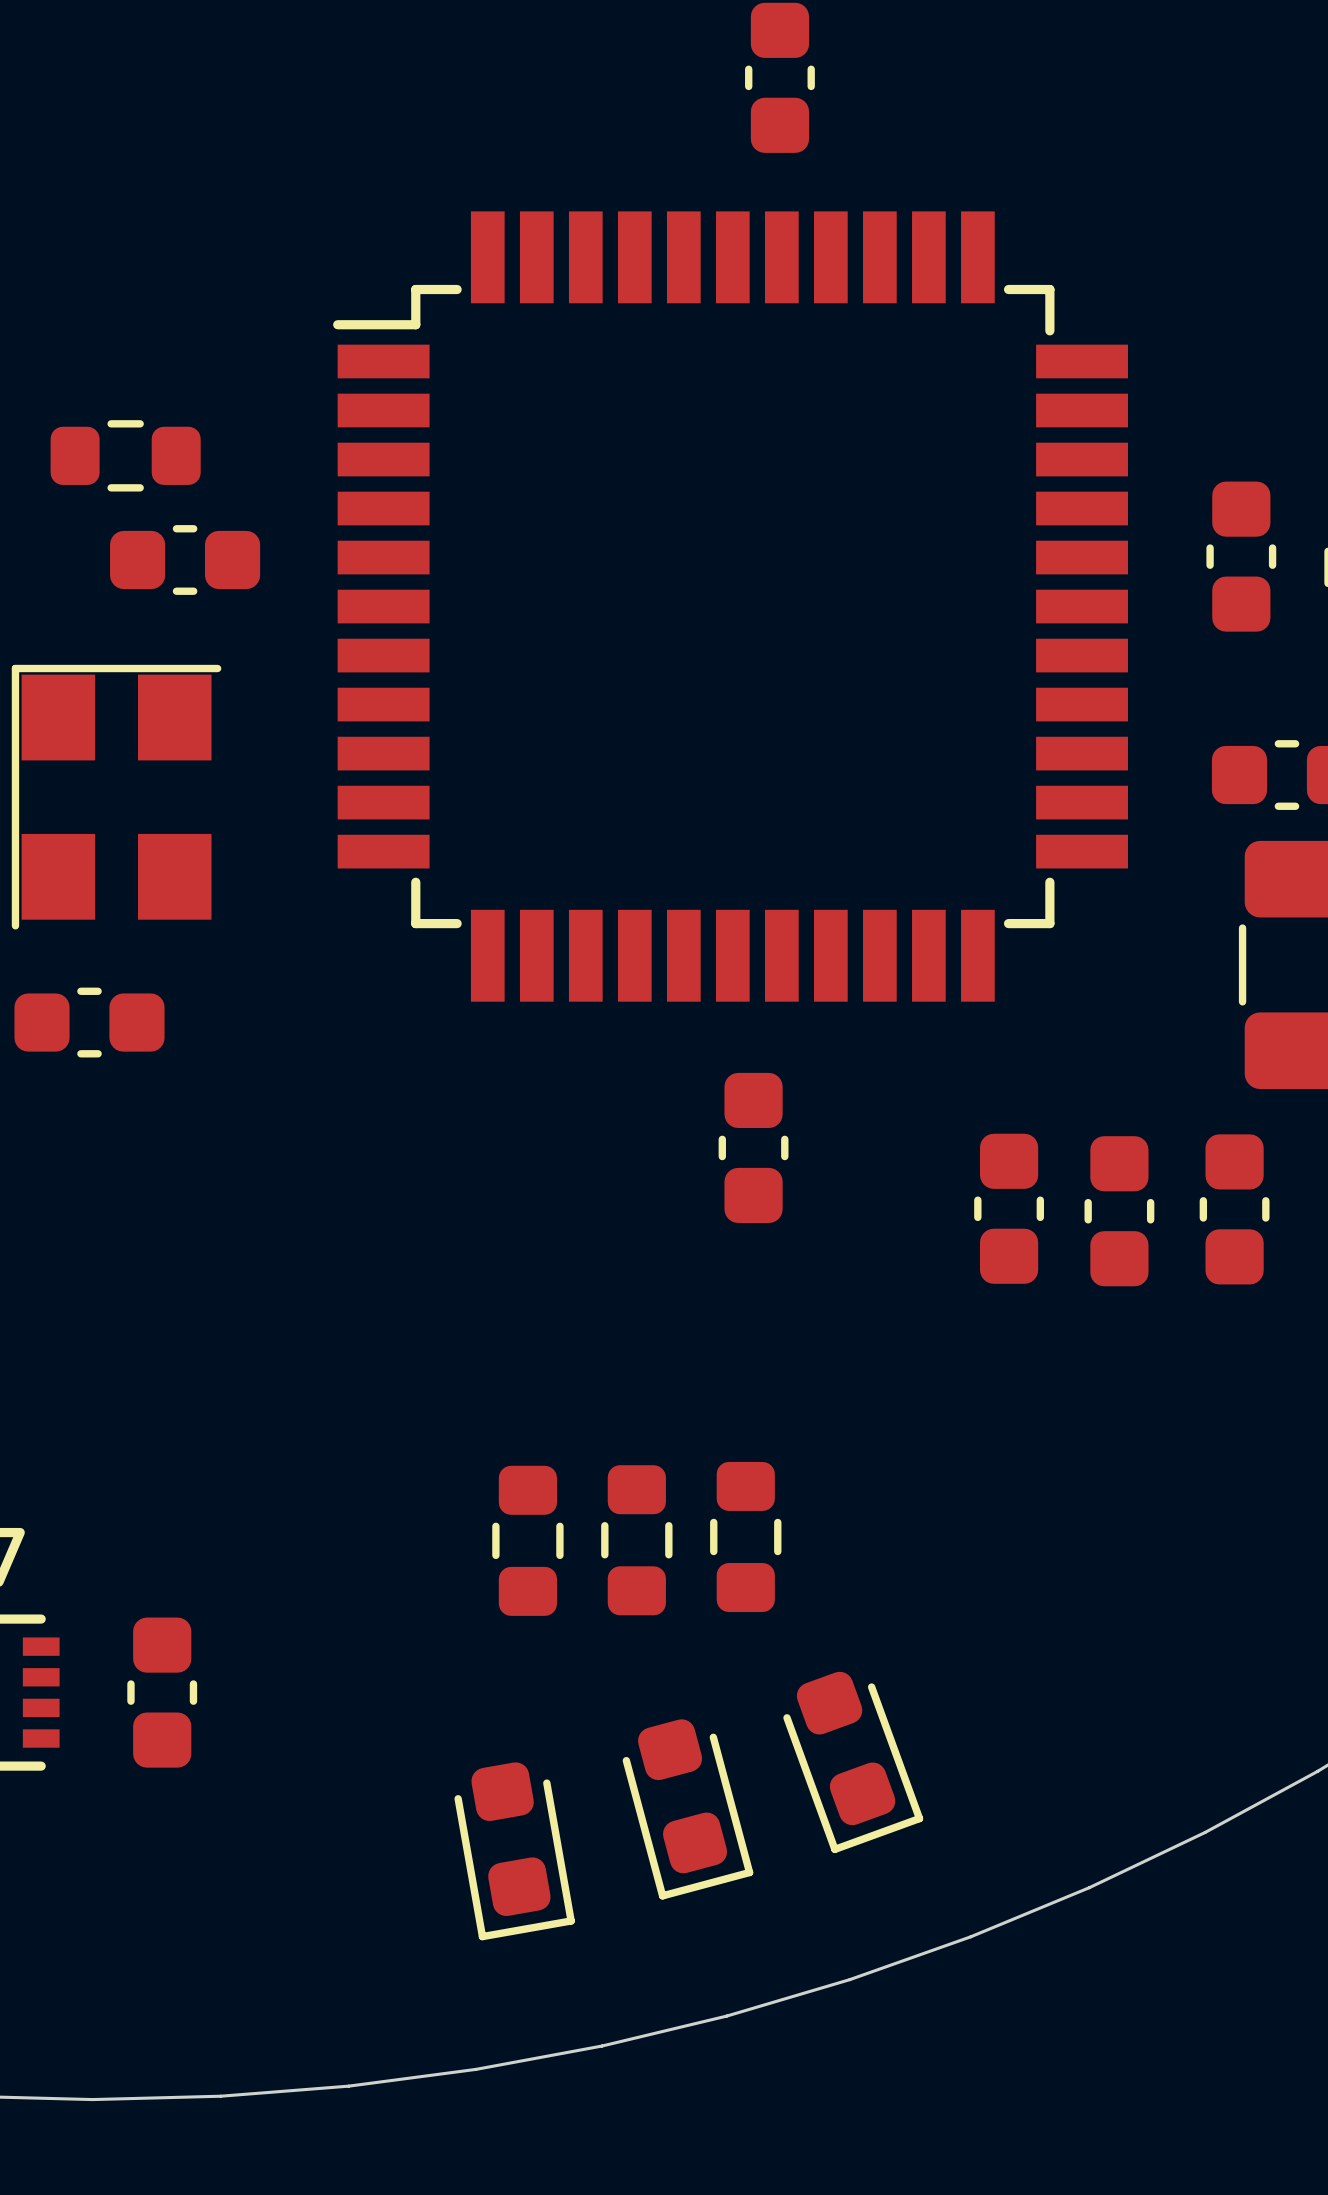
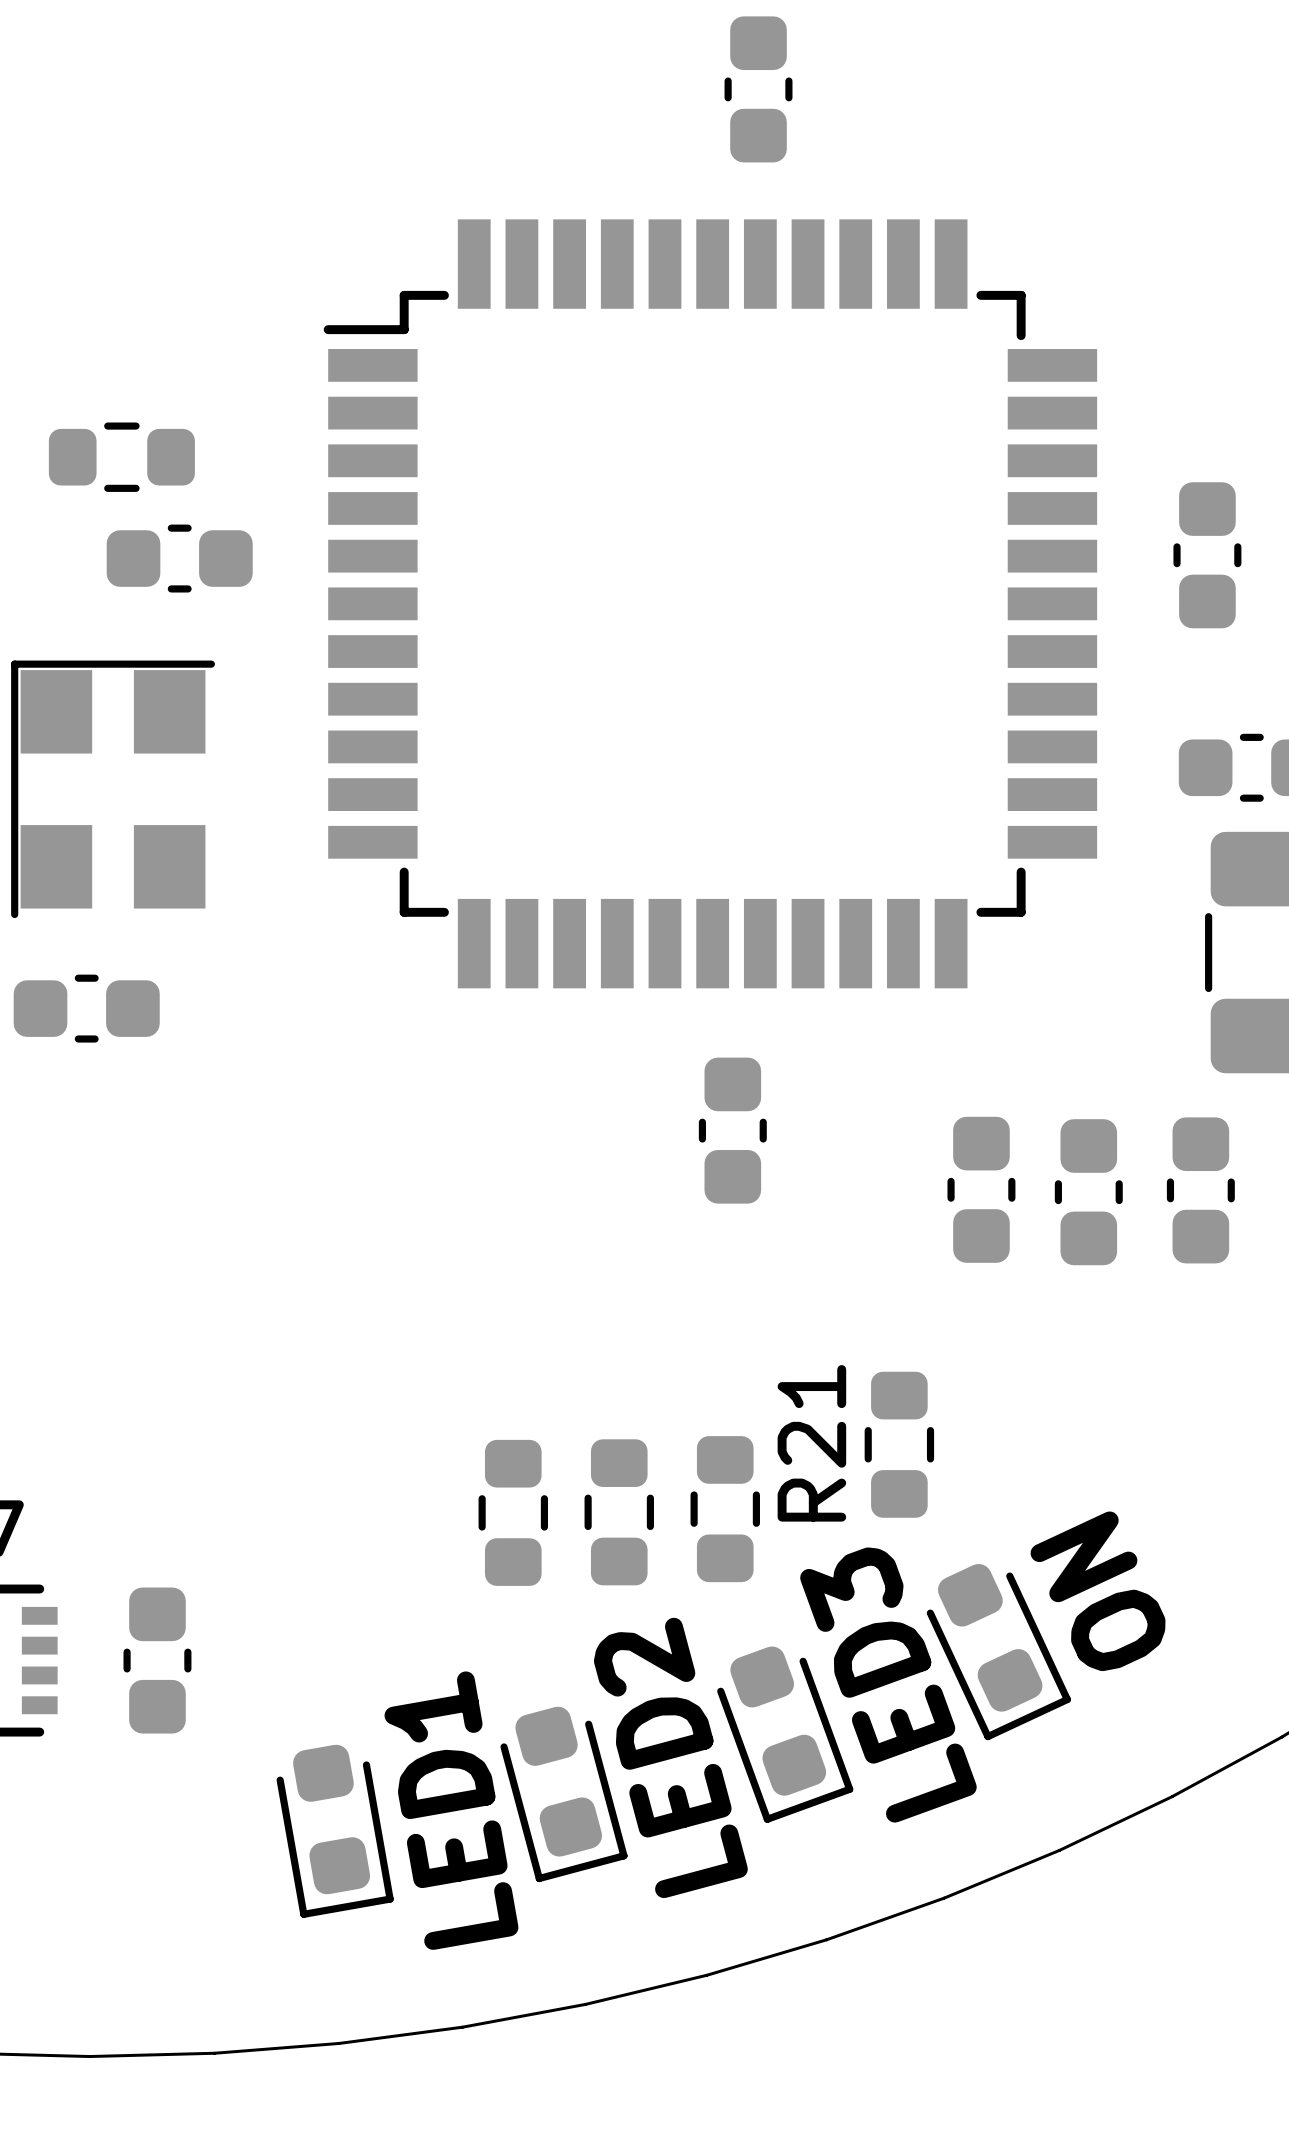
R21: none -> (899, 1444)
text: none -> ON (1098, 1591)
part: none -> (998, 1652)
text: none -> LED3 (888, 1685)
part position: (853, 1762) -> (785, 1734)
text: none -> LED2 (670, 1757)
part position: (687, 1809) -> (563, 1794)
text: none -> LED1 (451, 1810)
part position: (514, 1851) -> (335, 1831)

